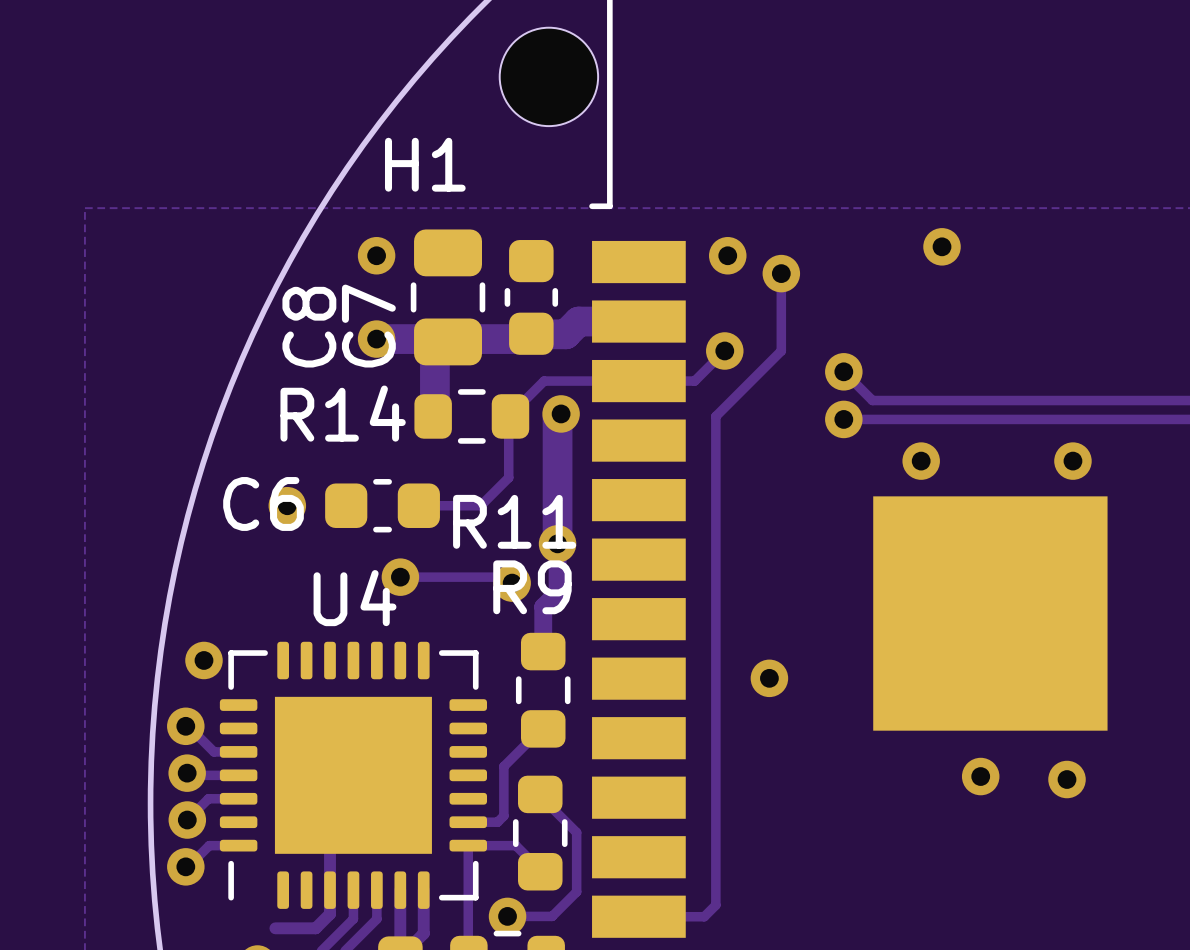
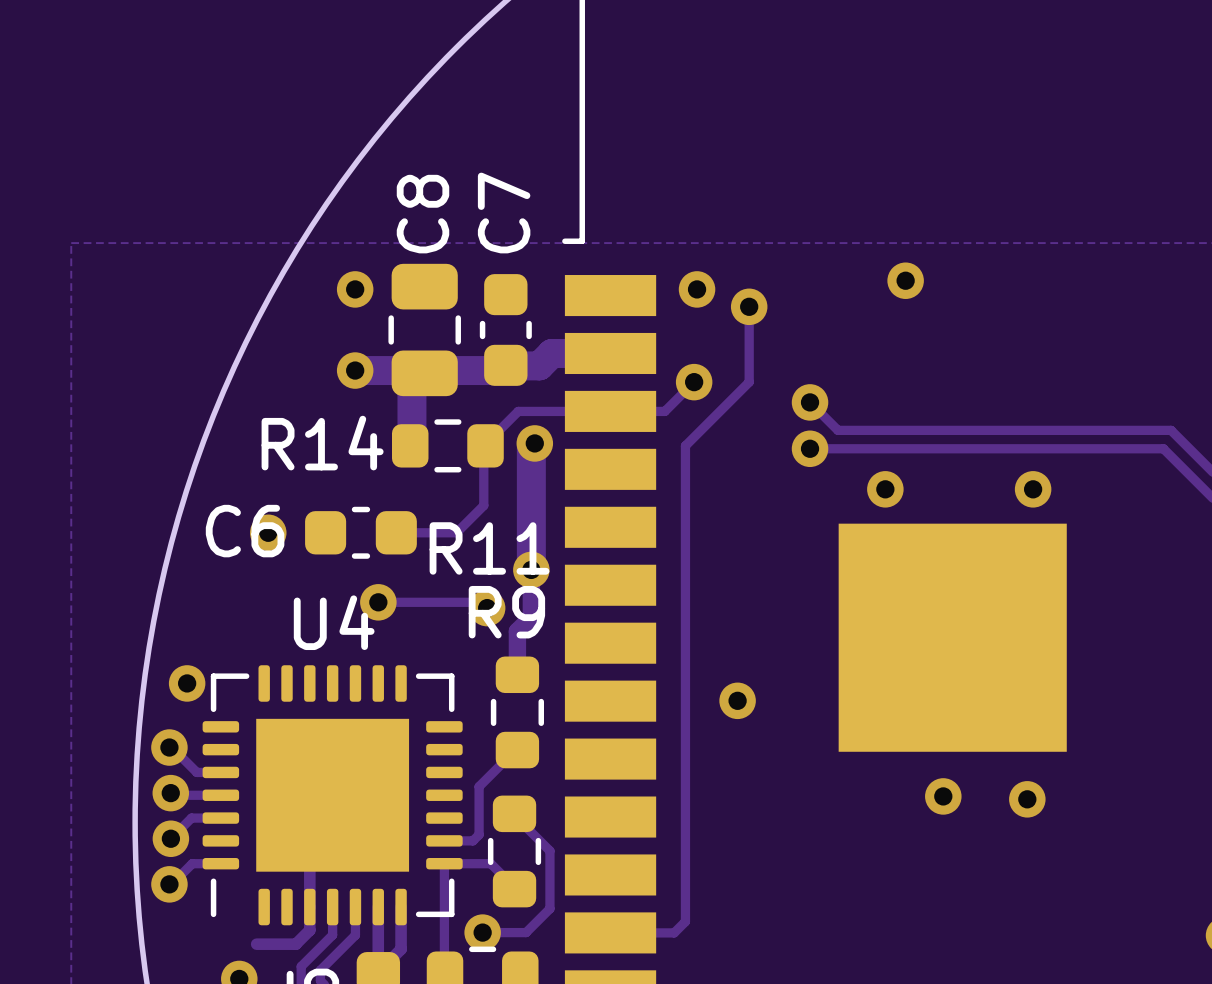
H1: (548, 76) -> none
C7 name position: C7 (368, 326) -> C7 (504, 213)
C8 name position: C8 (309, 327) -> C8 (423, 214)

